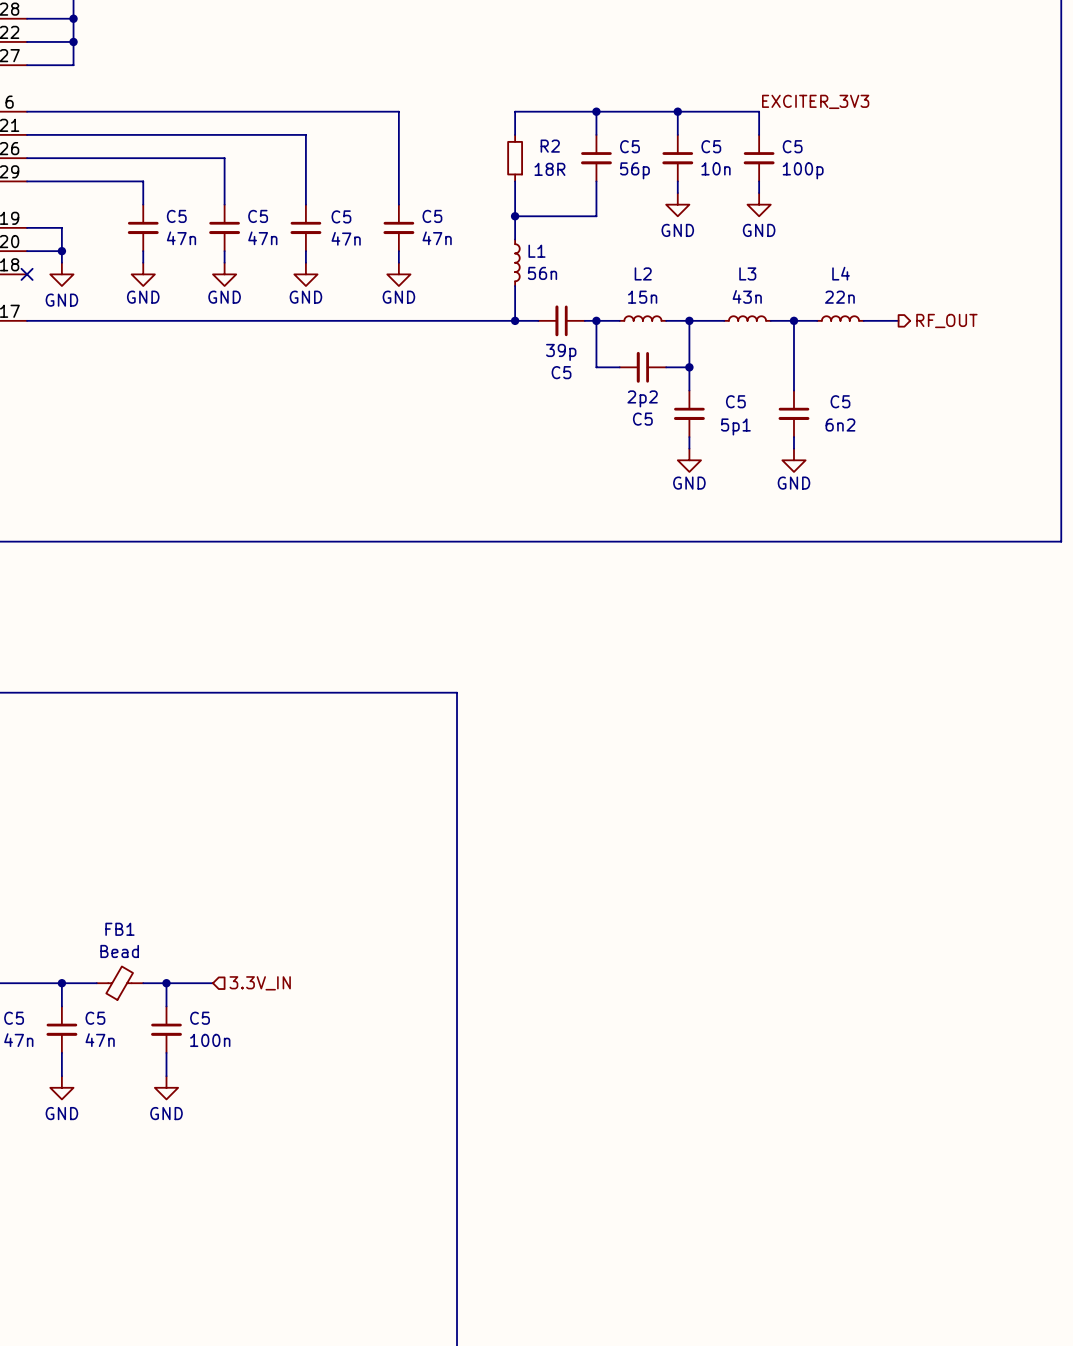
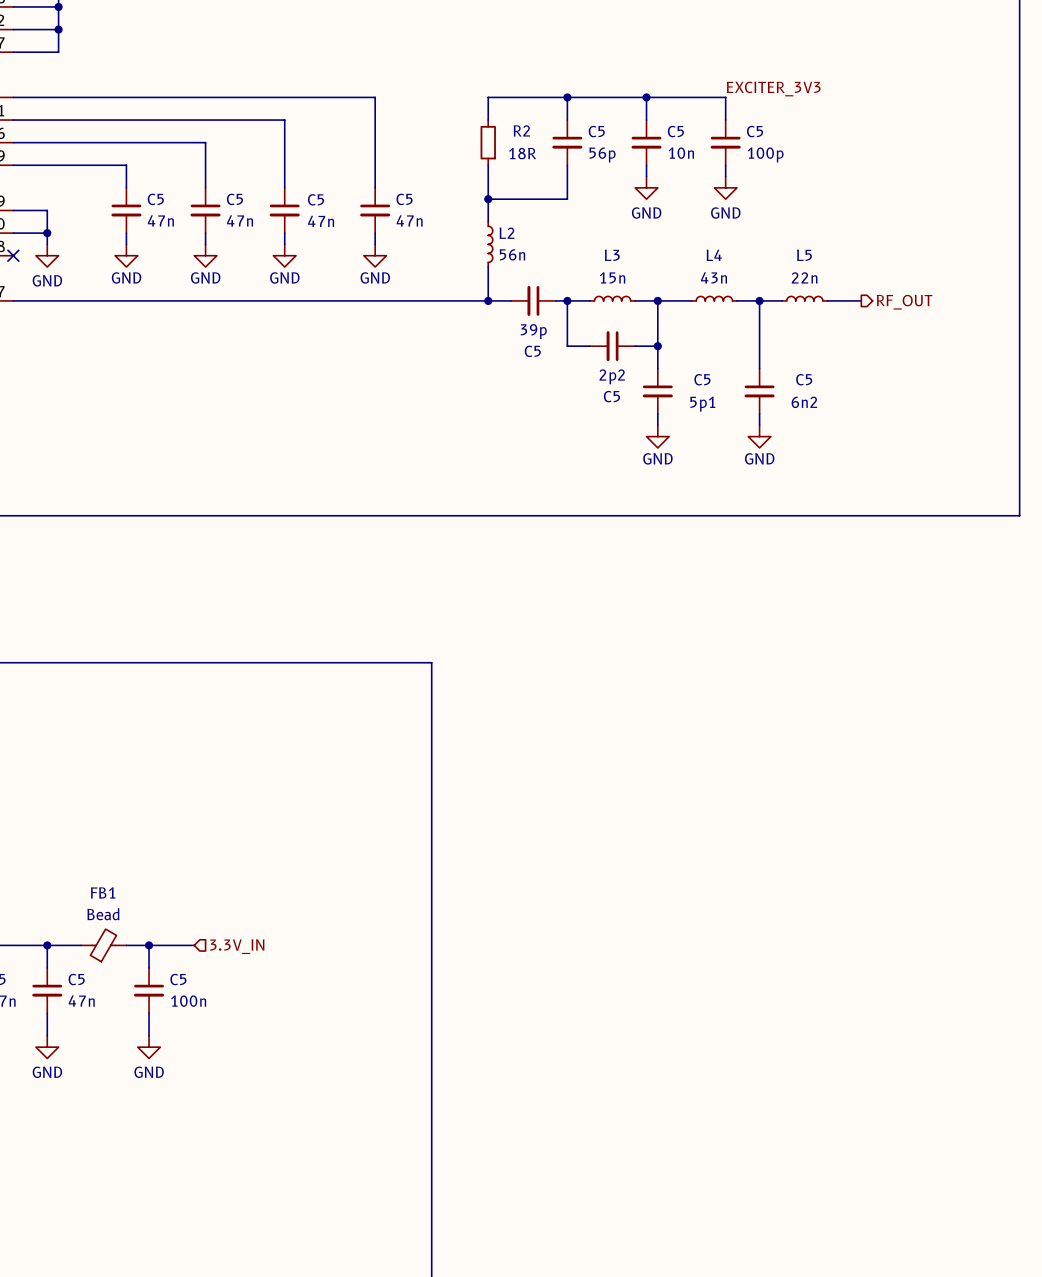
L1 name: L1 (536, 251) -> L2 (507, 233)
L2 name: L2 (643, 273) -> L3 (612, 255)
L3 name: L3 (747, 273) -> L4 (714, 255)
L4 name: L4 (841, 273) -> L5 (804, 255)

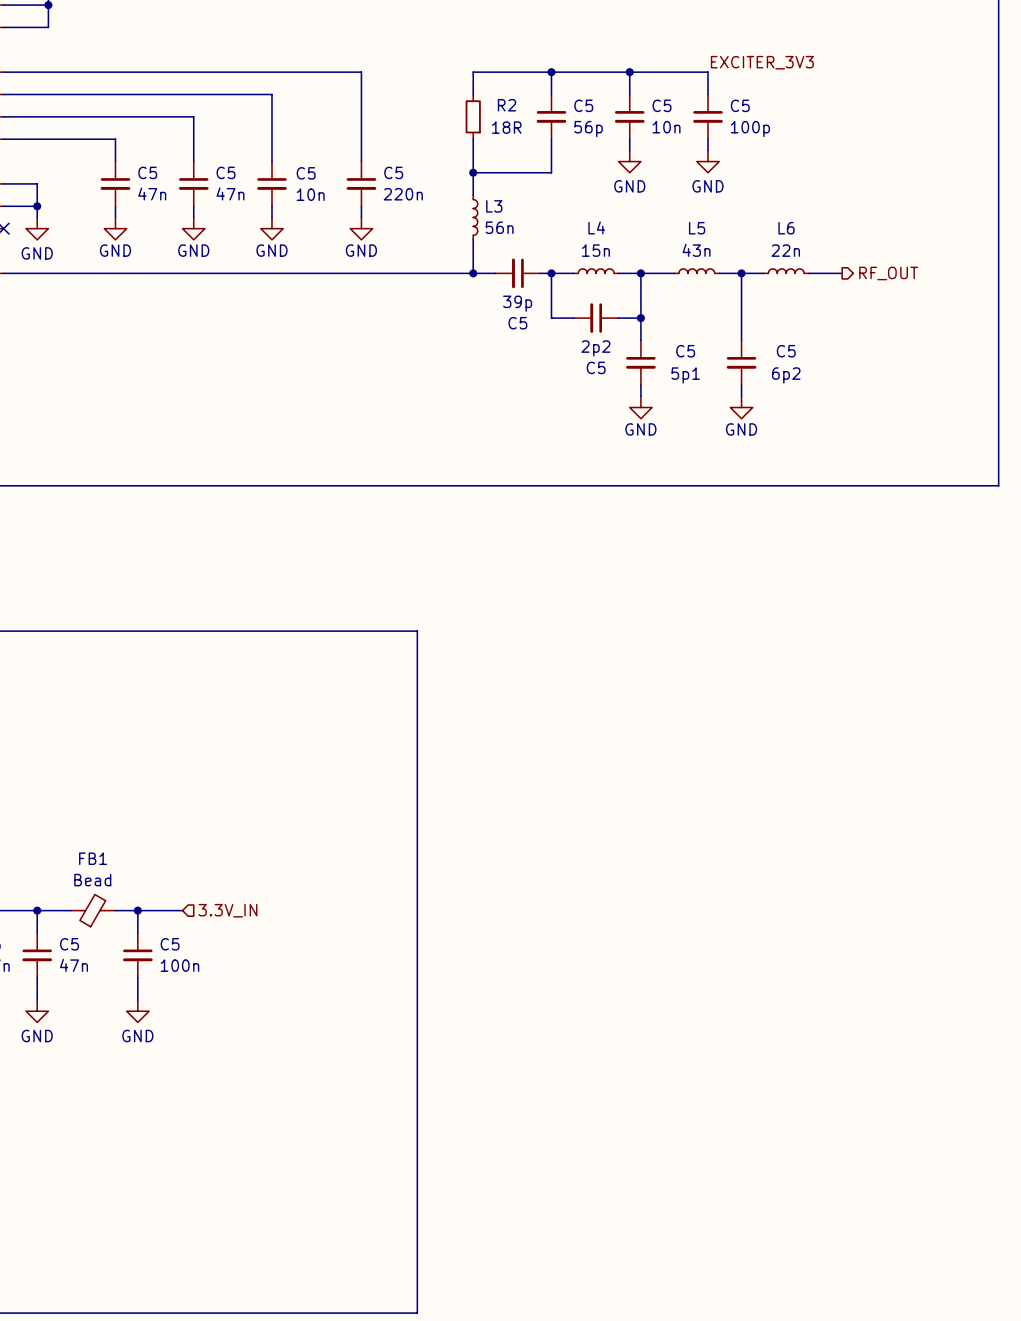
C5 value: 47n (409, 220) -> 220n (403, 194)
C5 value: 47n (321, 221) -> 10n (310, 194)
L2 name: L2 (507, 233) -> L3 (494, 206)
L3 name: L3 (612, 255) -> L4 (596, 227)
L4 name: L4 (714, 255) -> L5 (697, 228)
L5 name: L5 (804, 255) -> L6 (786, 228)
C5 value: 6n2 (804, 402) -> 6p2 (786, 375)

